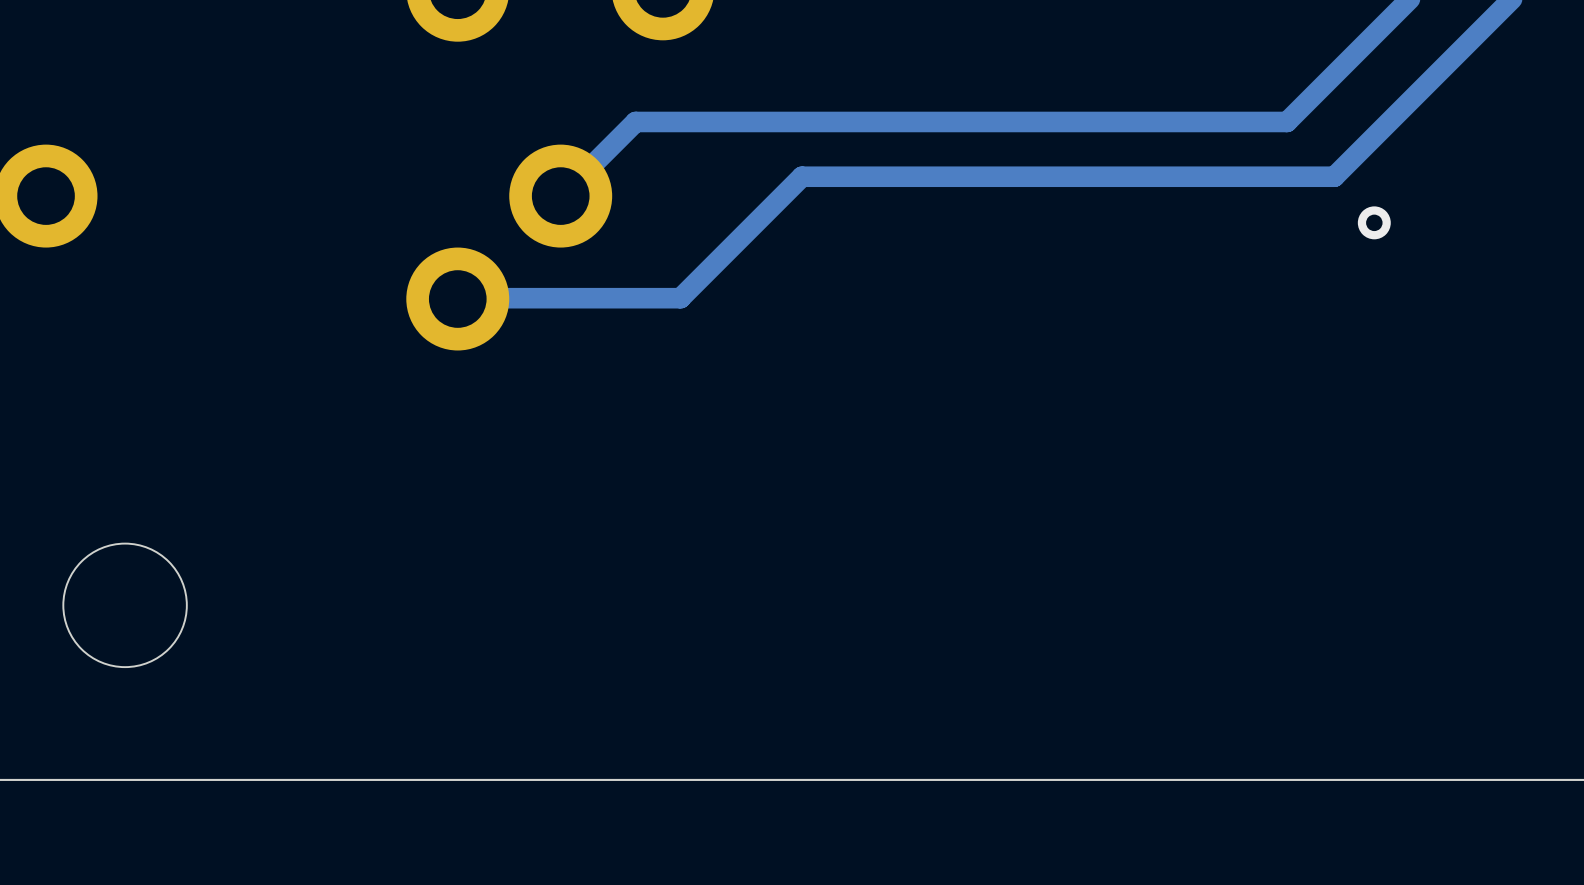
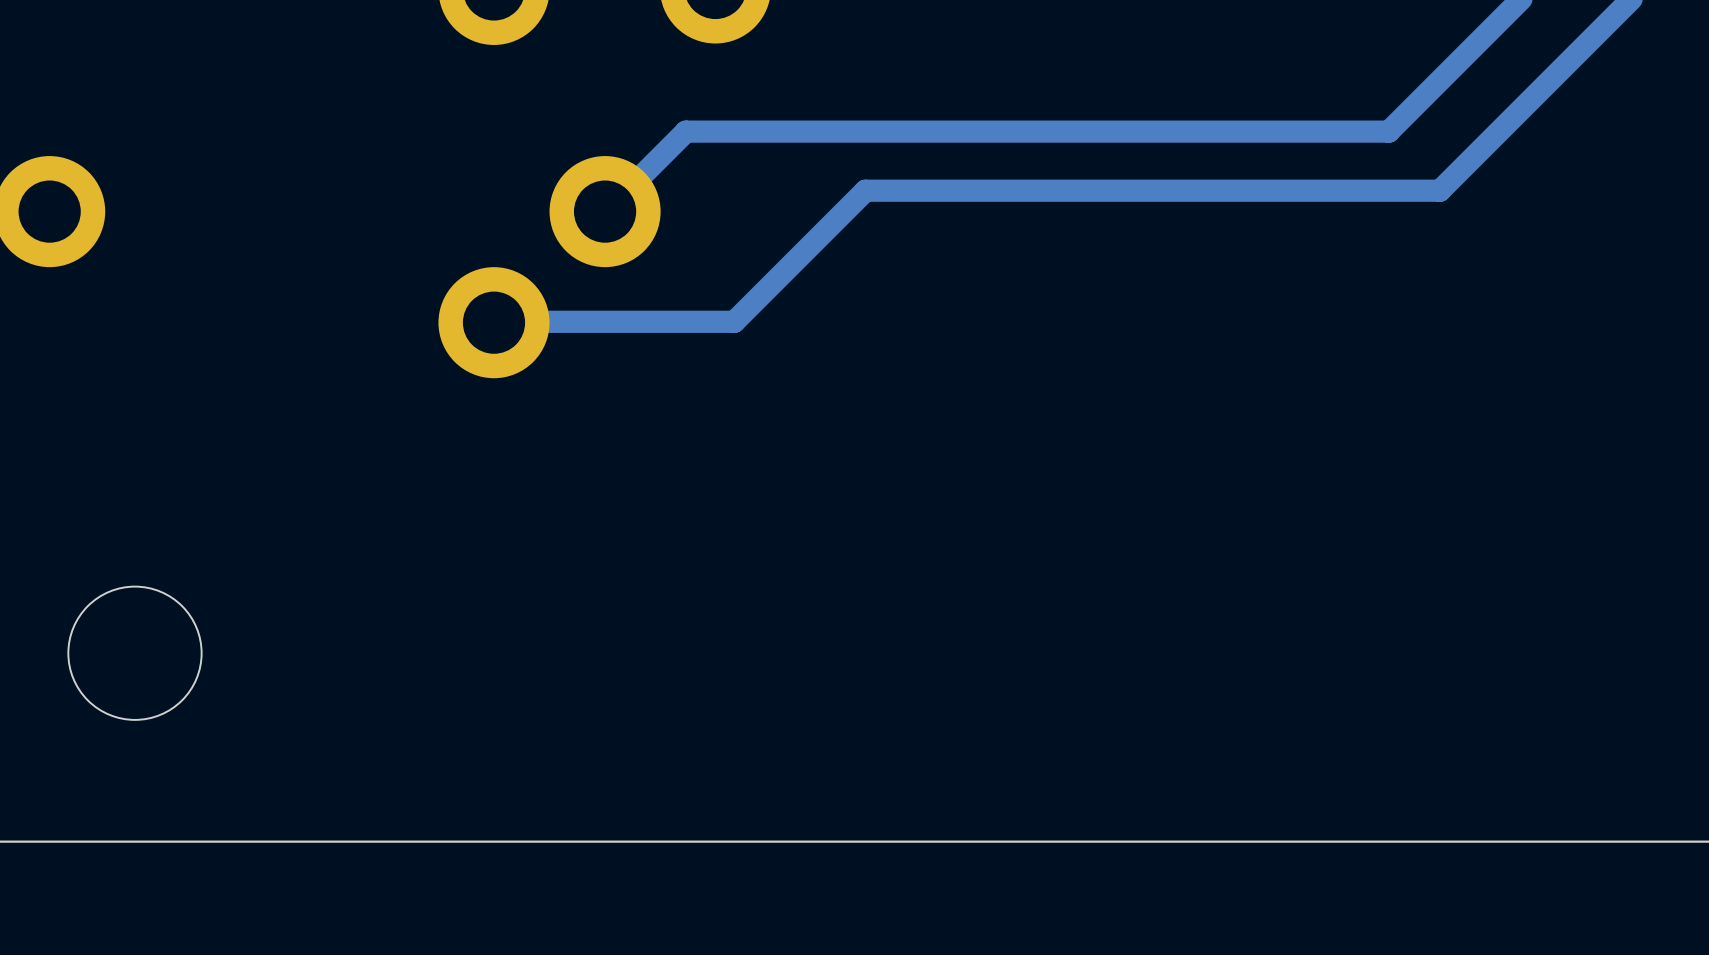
via: (1374, 222) -> none

